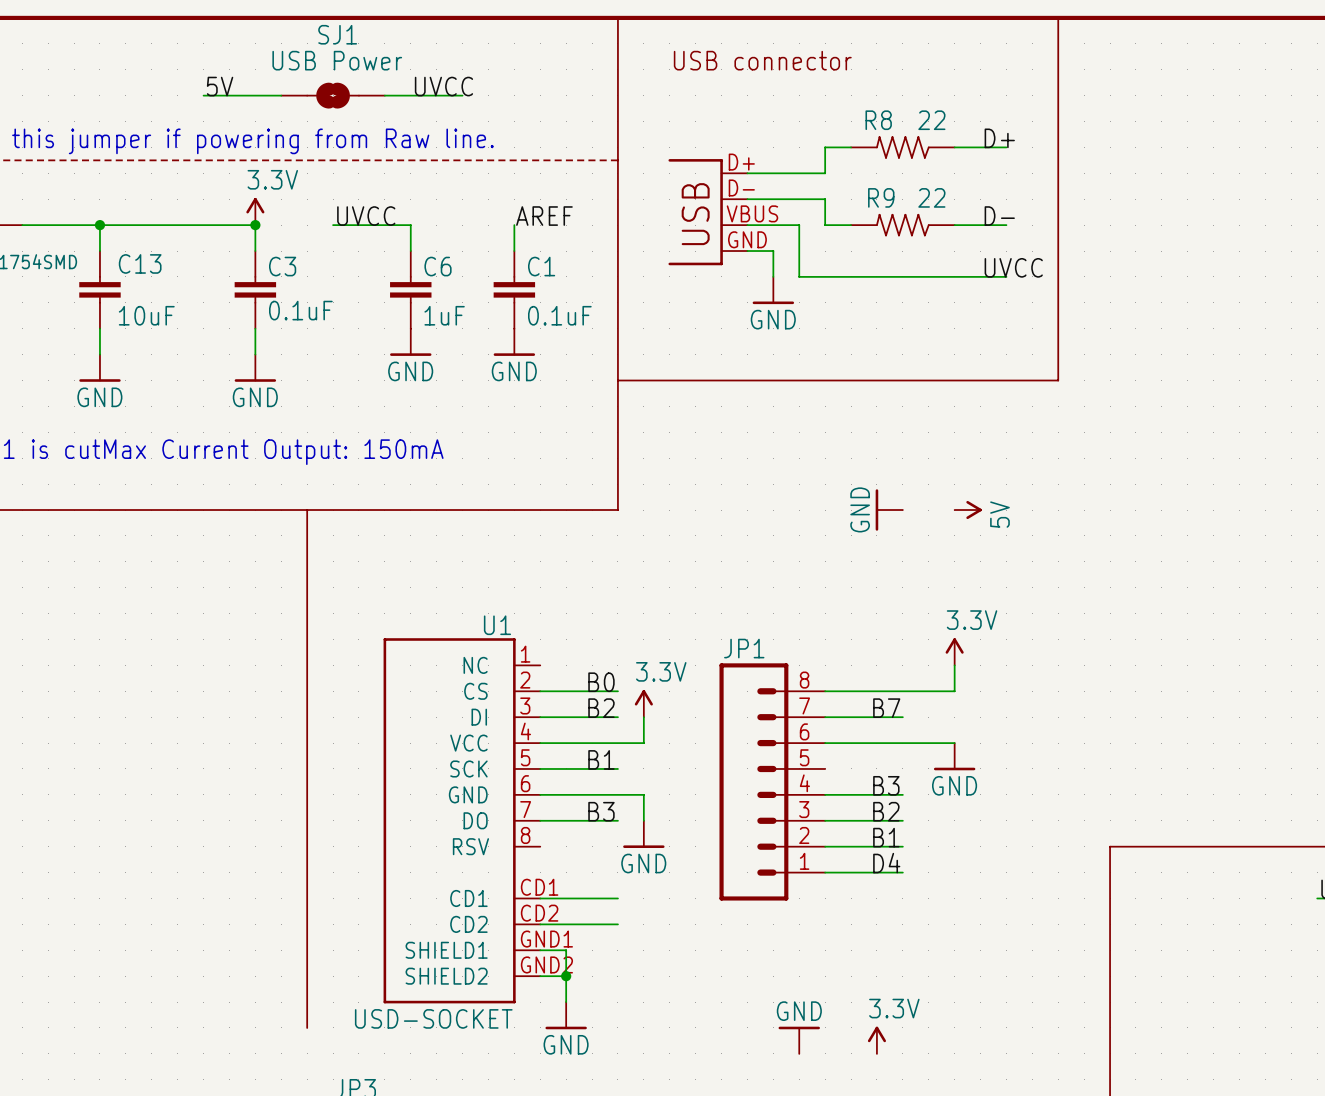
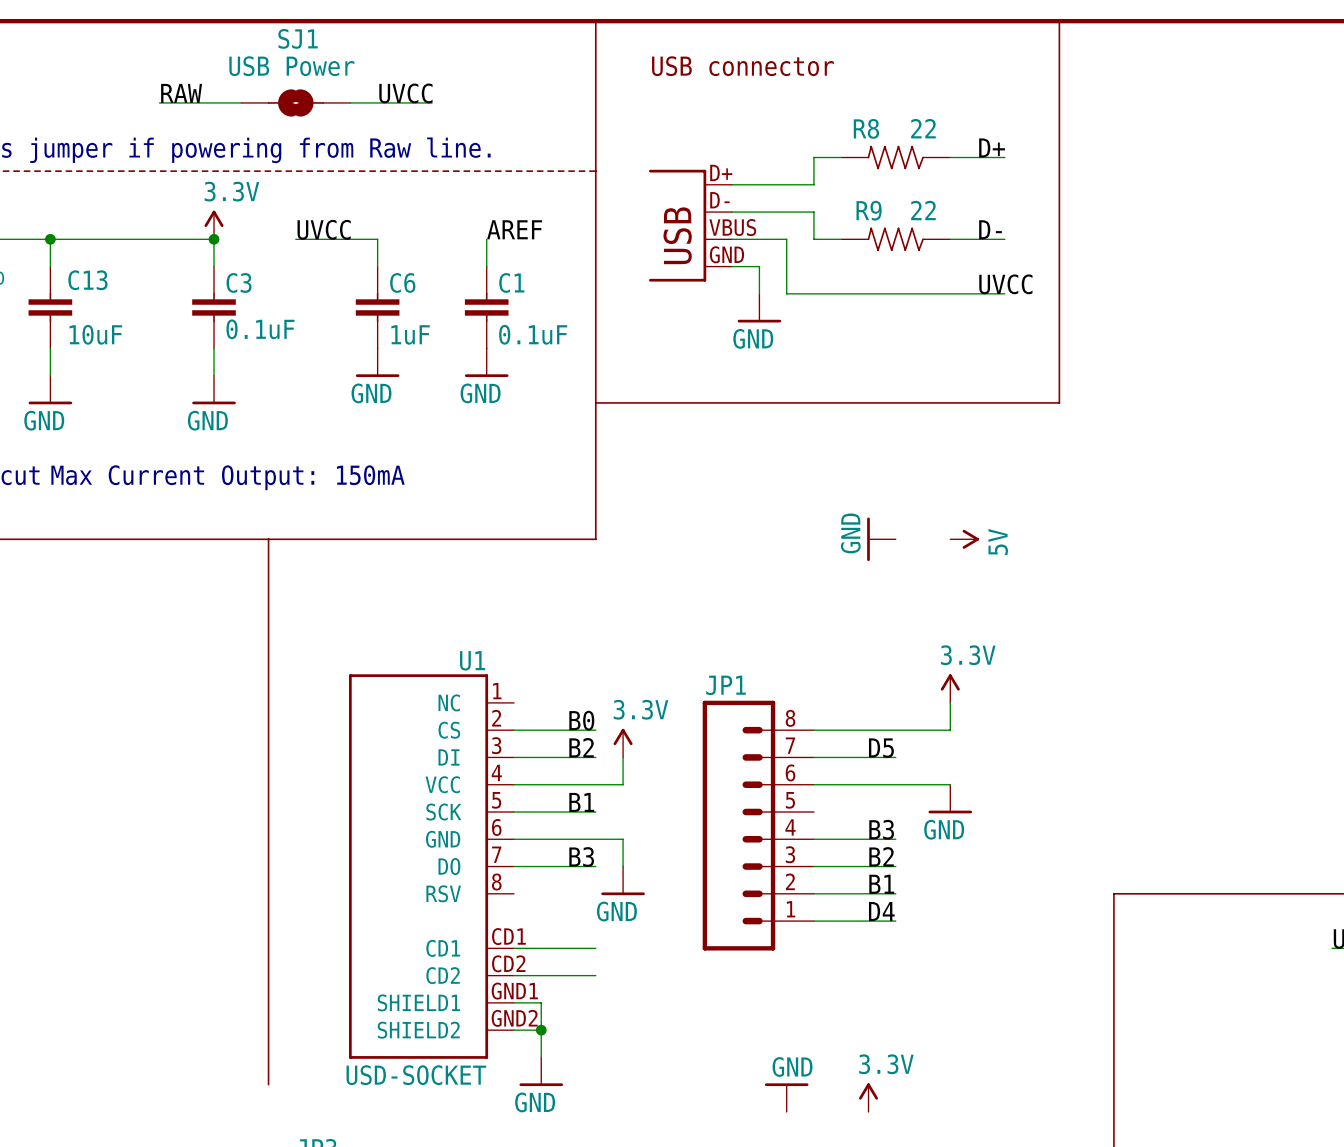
label: 5V (220, 86) -> RAW (181, 93)
label: B7 (886, 708) -> D5 (881, 748)

